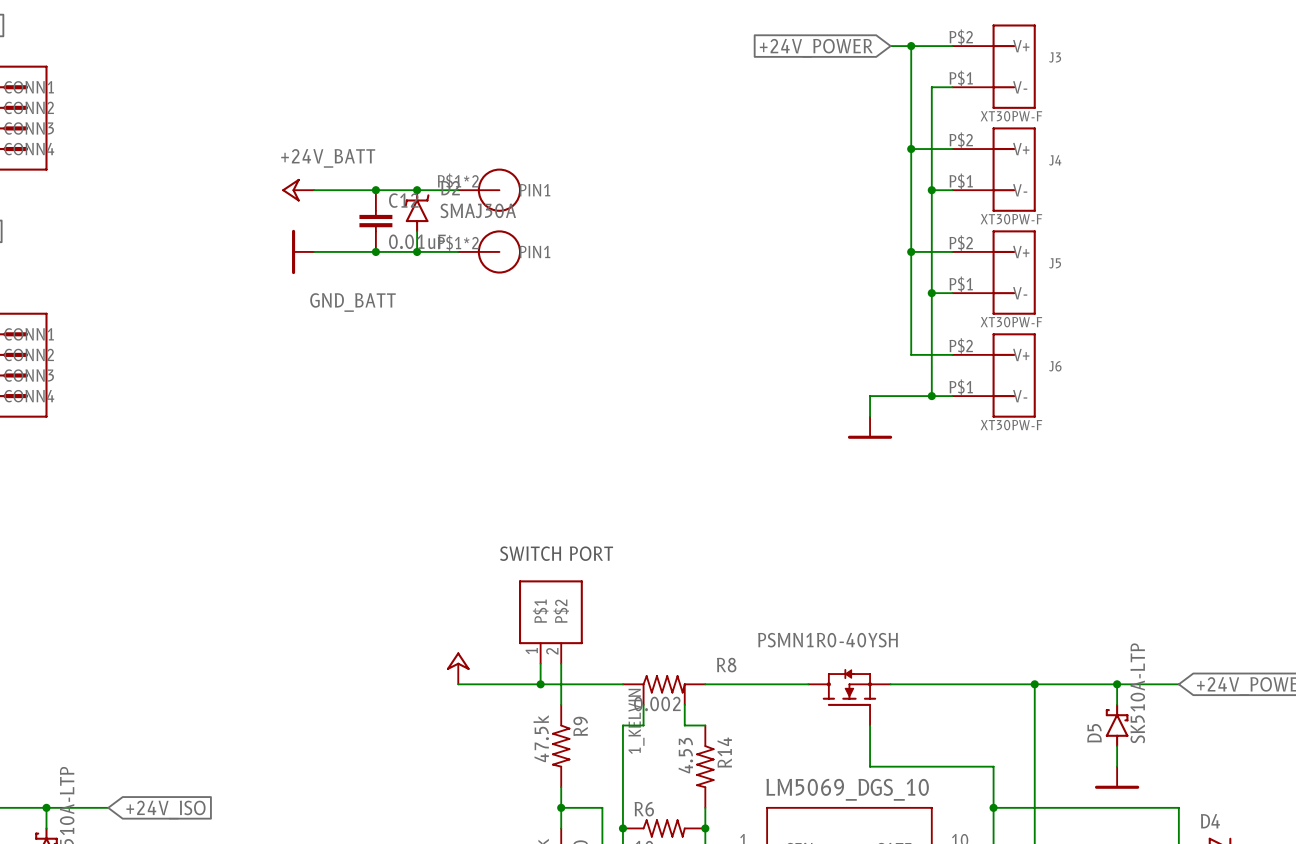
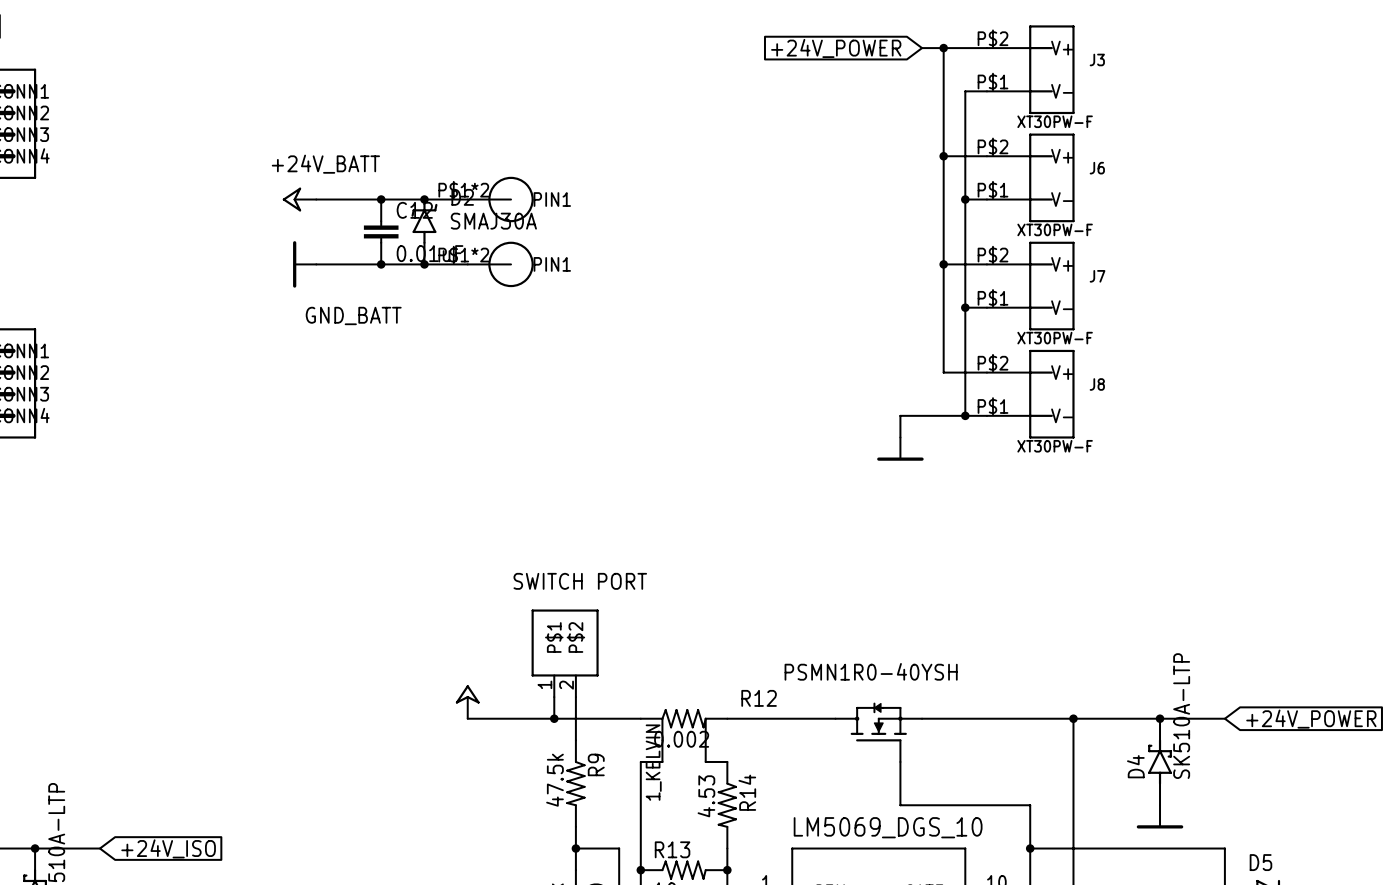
J4 name: J4 (1055, 160) -> J6 (1097, 168)
J5 name: J5 (1055, 263) -> J7 (1097, 276)
J6 name: J6 (1055, 366) -> J8 (1097, 384)
R8 name: R8 (726, 665) -> R12 (759, 698)
D5 name: D5 (1094, 733) -> D4 (1135, 766)
R6 name: R6 (644, 809) -> R13 (672, 849)
D4 name: D4 (1210, 821) -> D5 (1260, 862)

